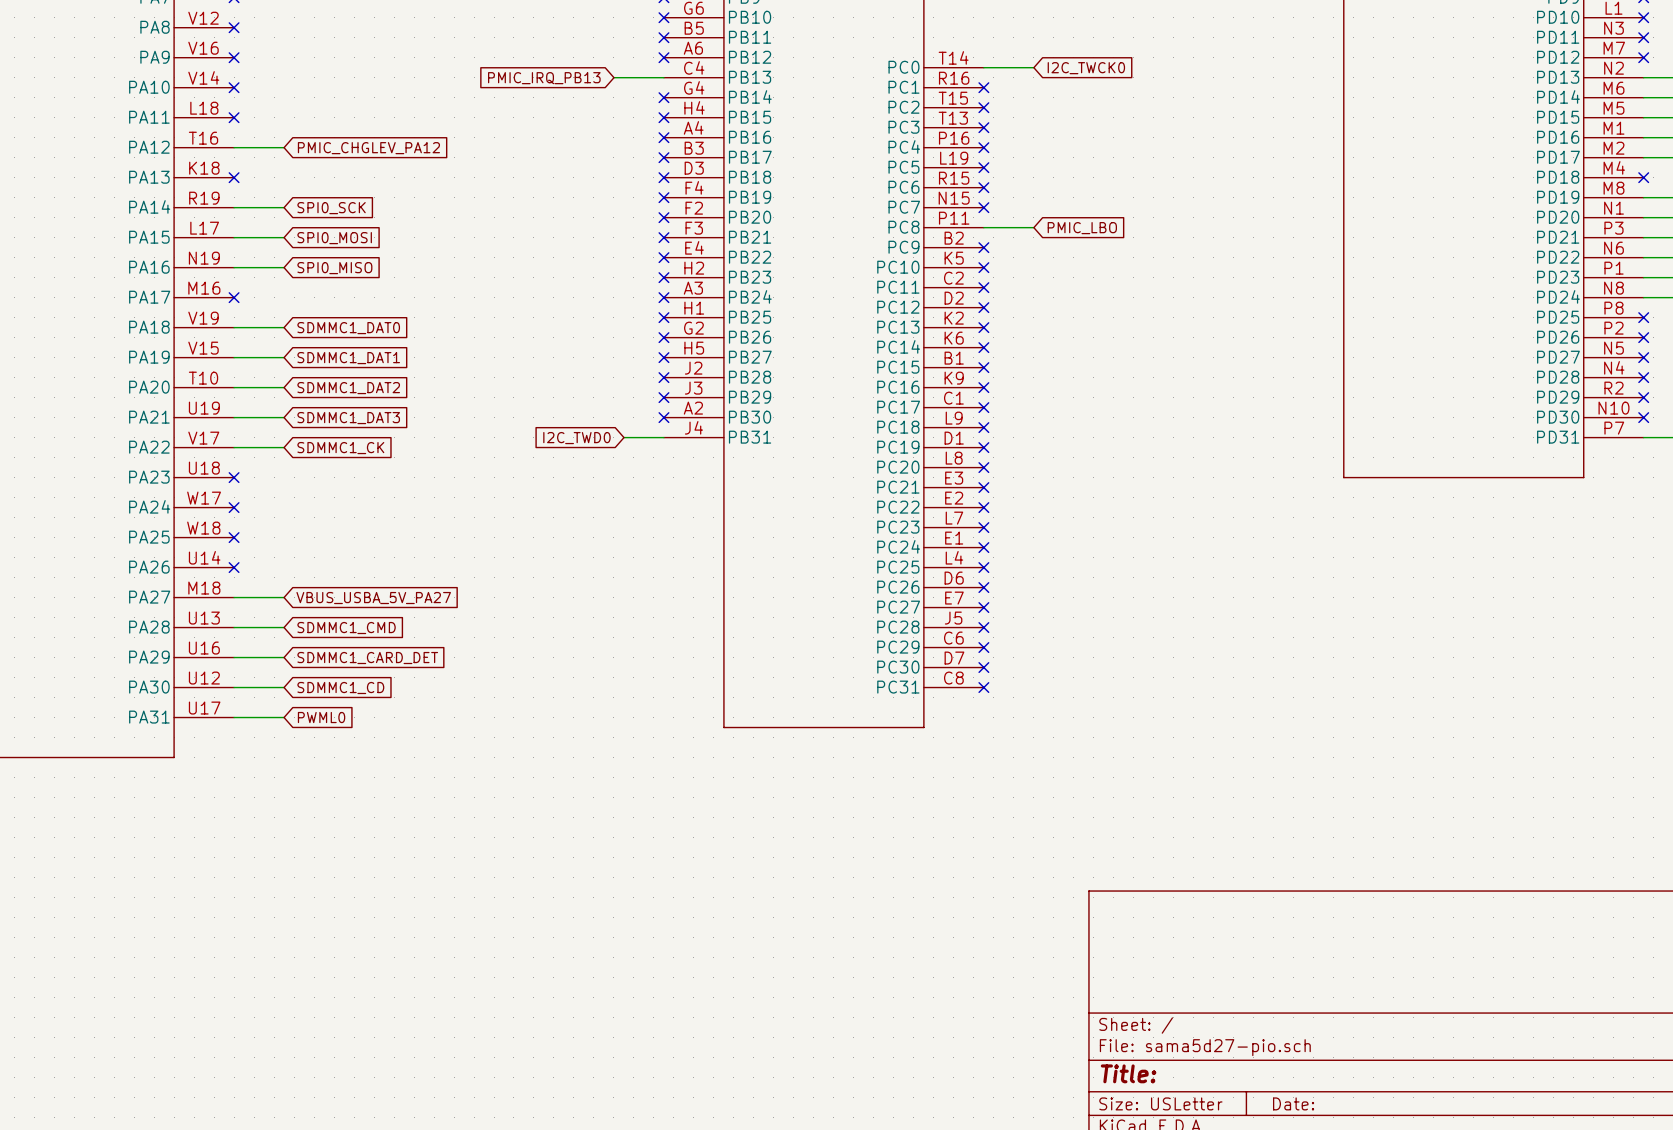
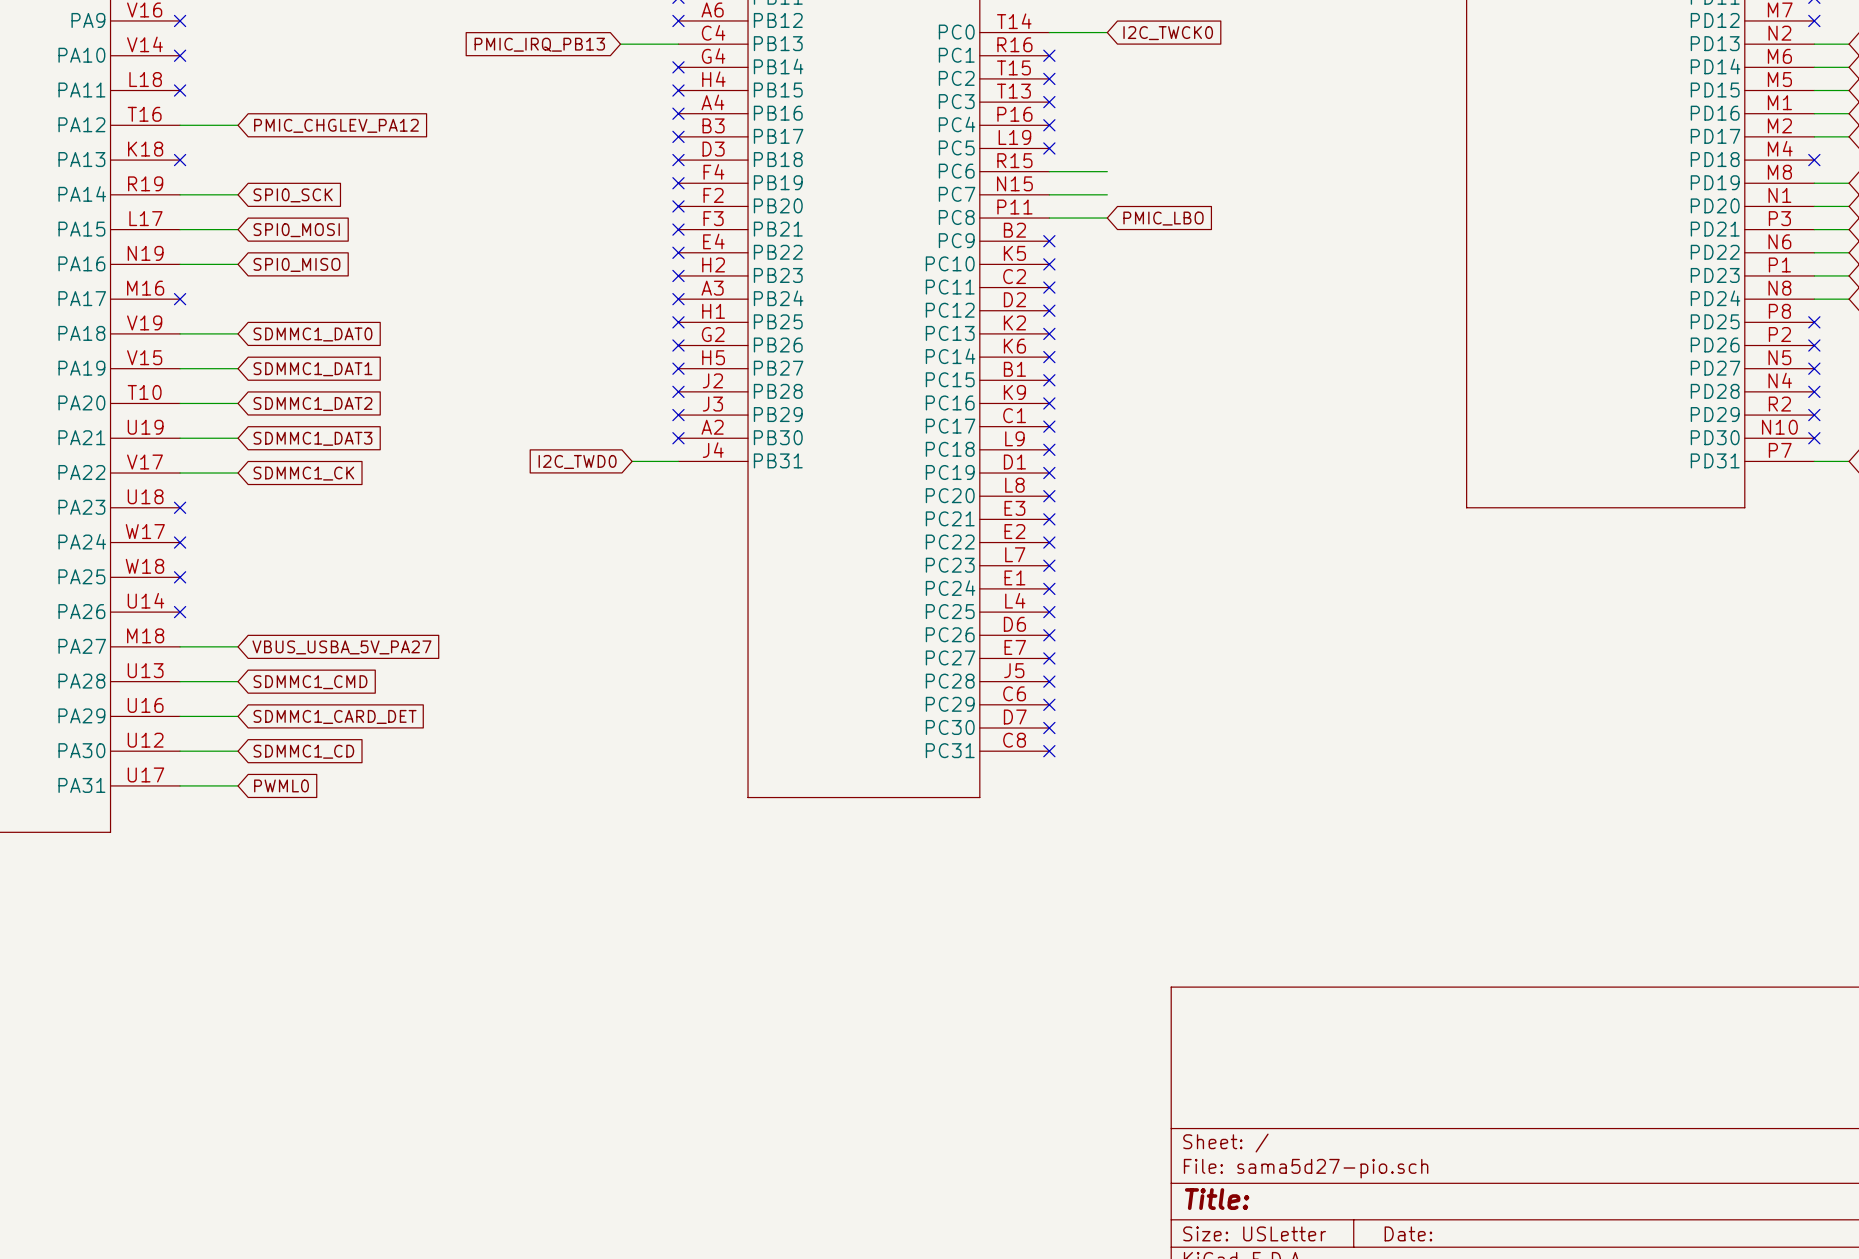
wire: none -> (1049, 171) (1107, 171)
no-connect mark: (983, 187) -> none
wire: none -> (1049, 194) (1107, 194)
no-connect mark: (983, 207) -> none

